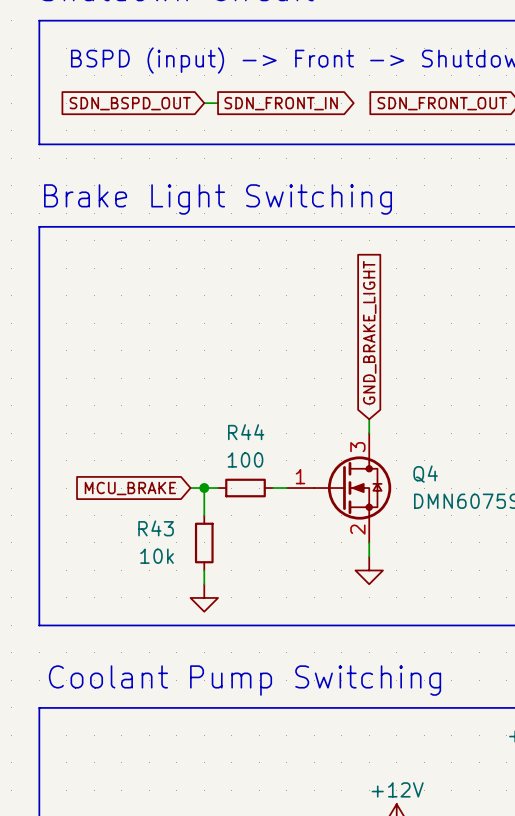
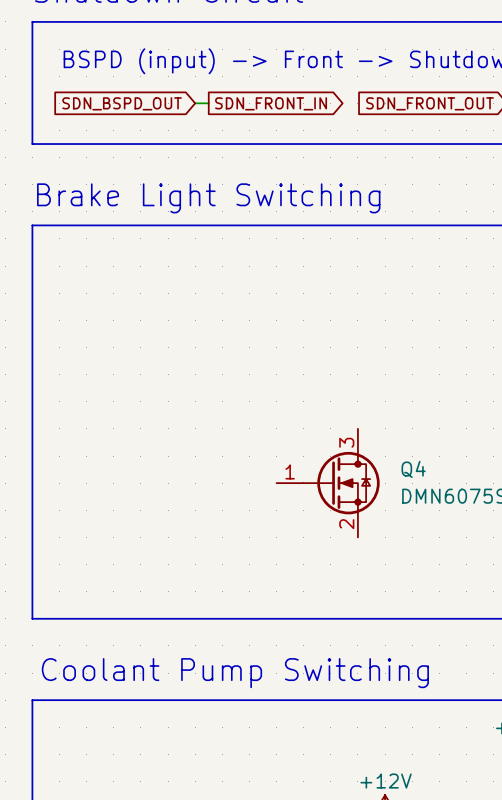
global label: GND_BRAKE_LIGHT (369, 332) -> none
wire: (369, 419) (369, 433) -> none
global label: MCU_BRAKE (130, 488) -> none
wire: (190, 488) (218, 488) -> none
wire: (204, 488) (204, 515) -> none
junction: (204, 488) -> none
R44: 100 (245, 488) -> none
wire: (273, 488) (286, 488) -> none
R43: 10k (204, 542) -> none
wire: (369, 542) (369, 556) -> none
wire: (204, 570) (204, 584) -> none
power symbol: (369, 570) -> none
power symbol: (204, 597) -> none

